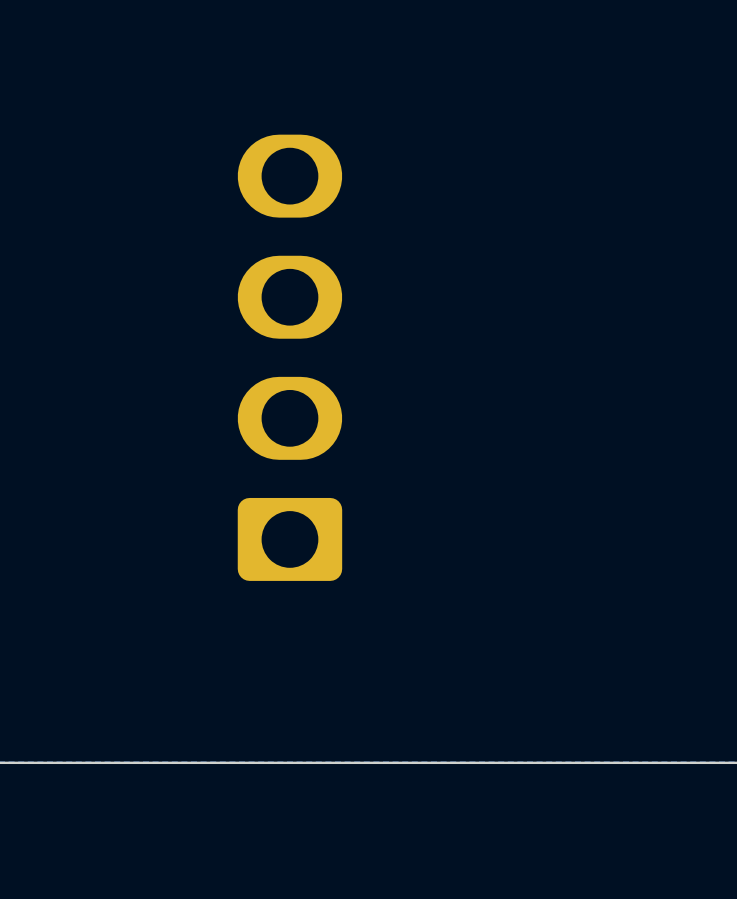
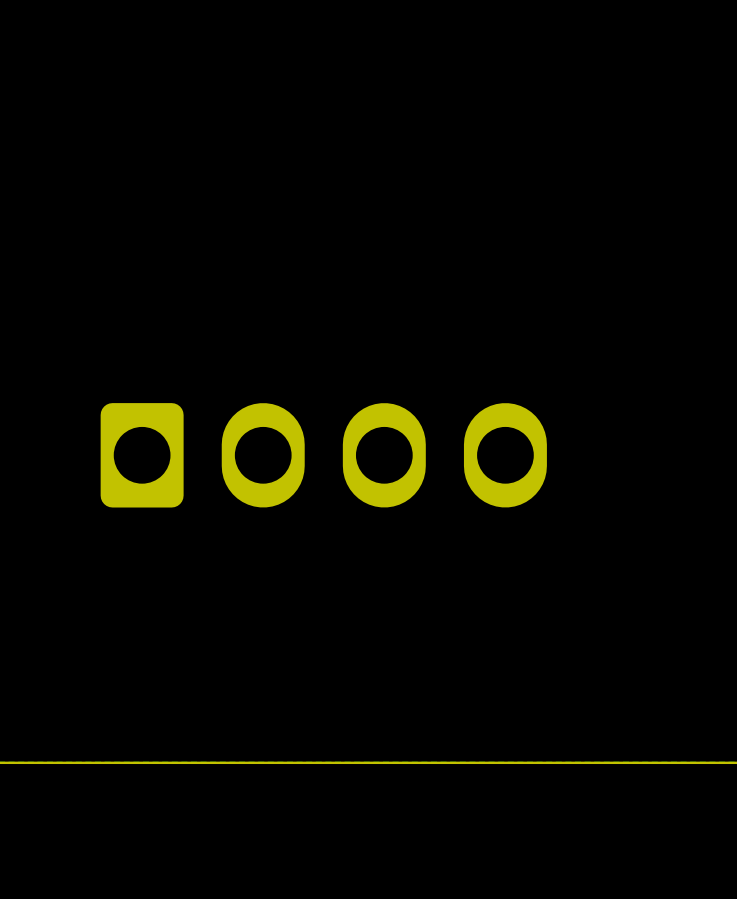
part rotation: 0° (289, 357) -> 90° clockwise (323, 455)

